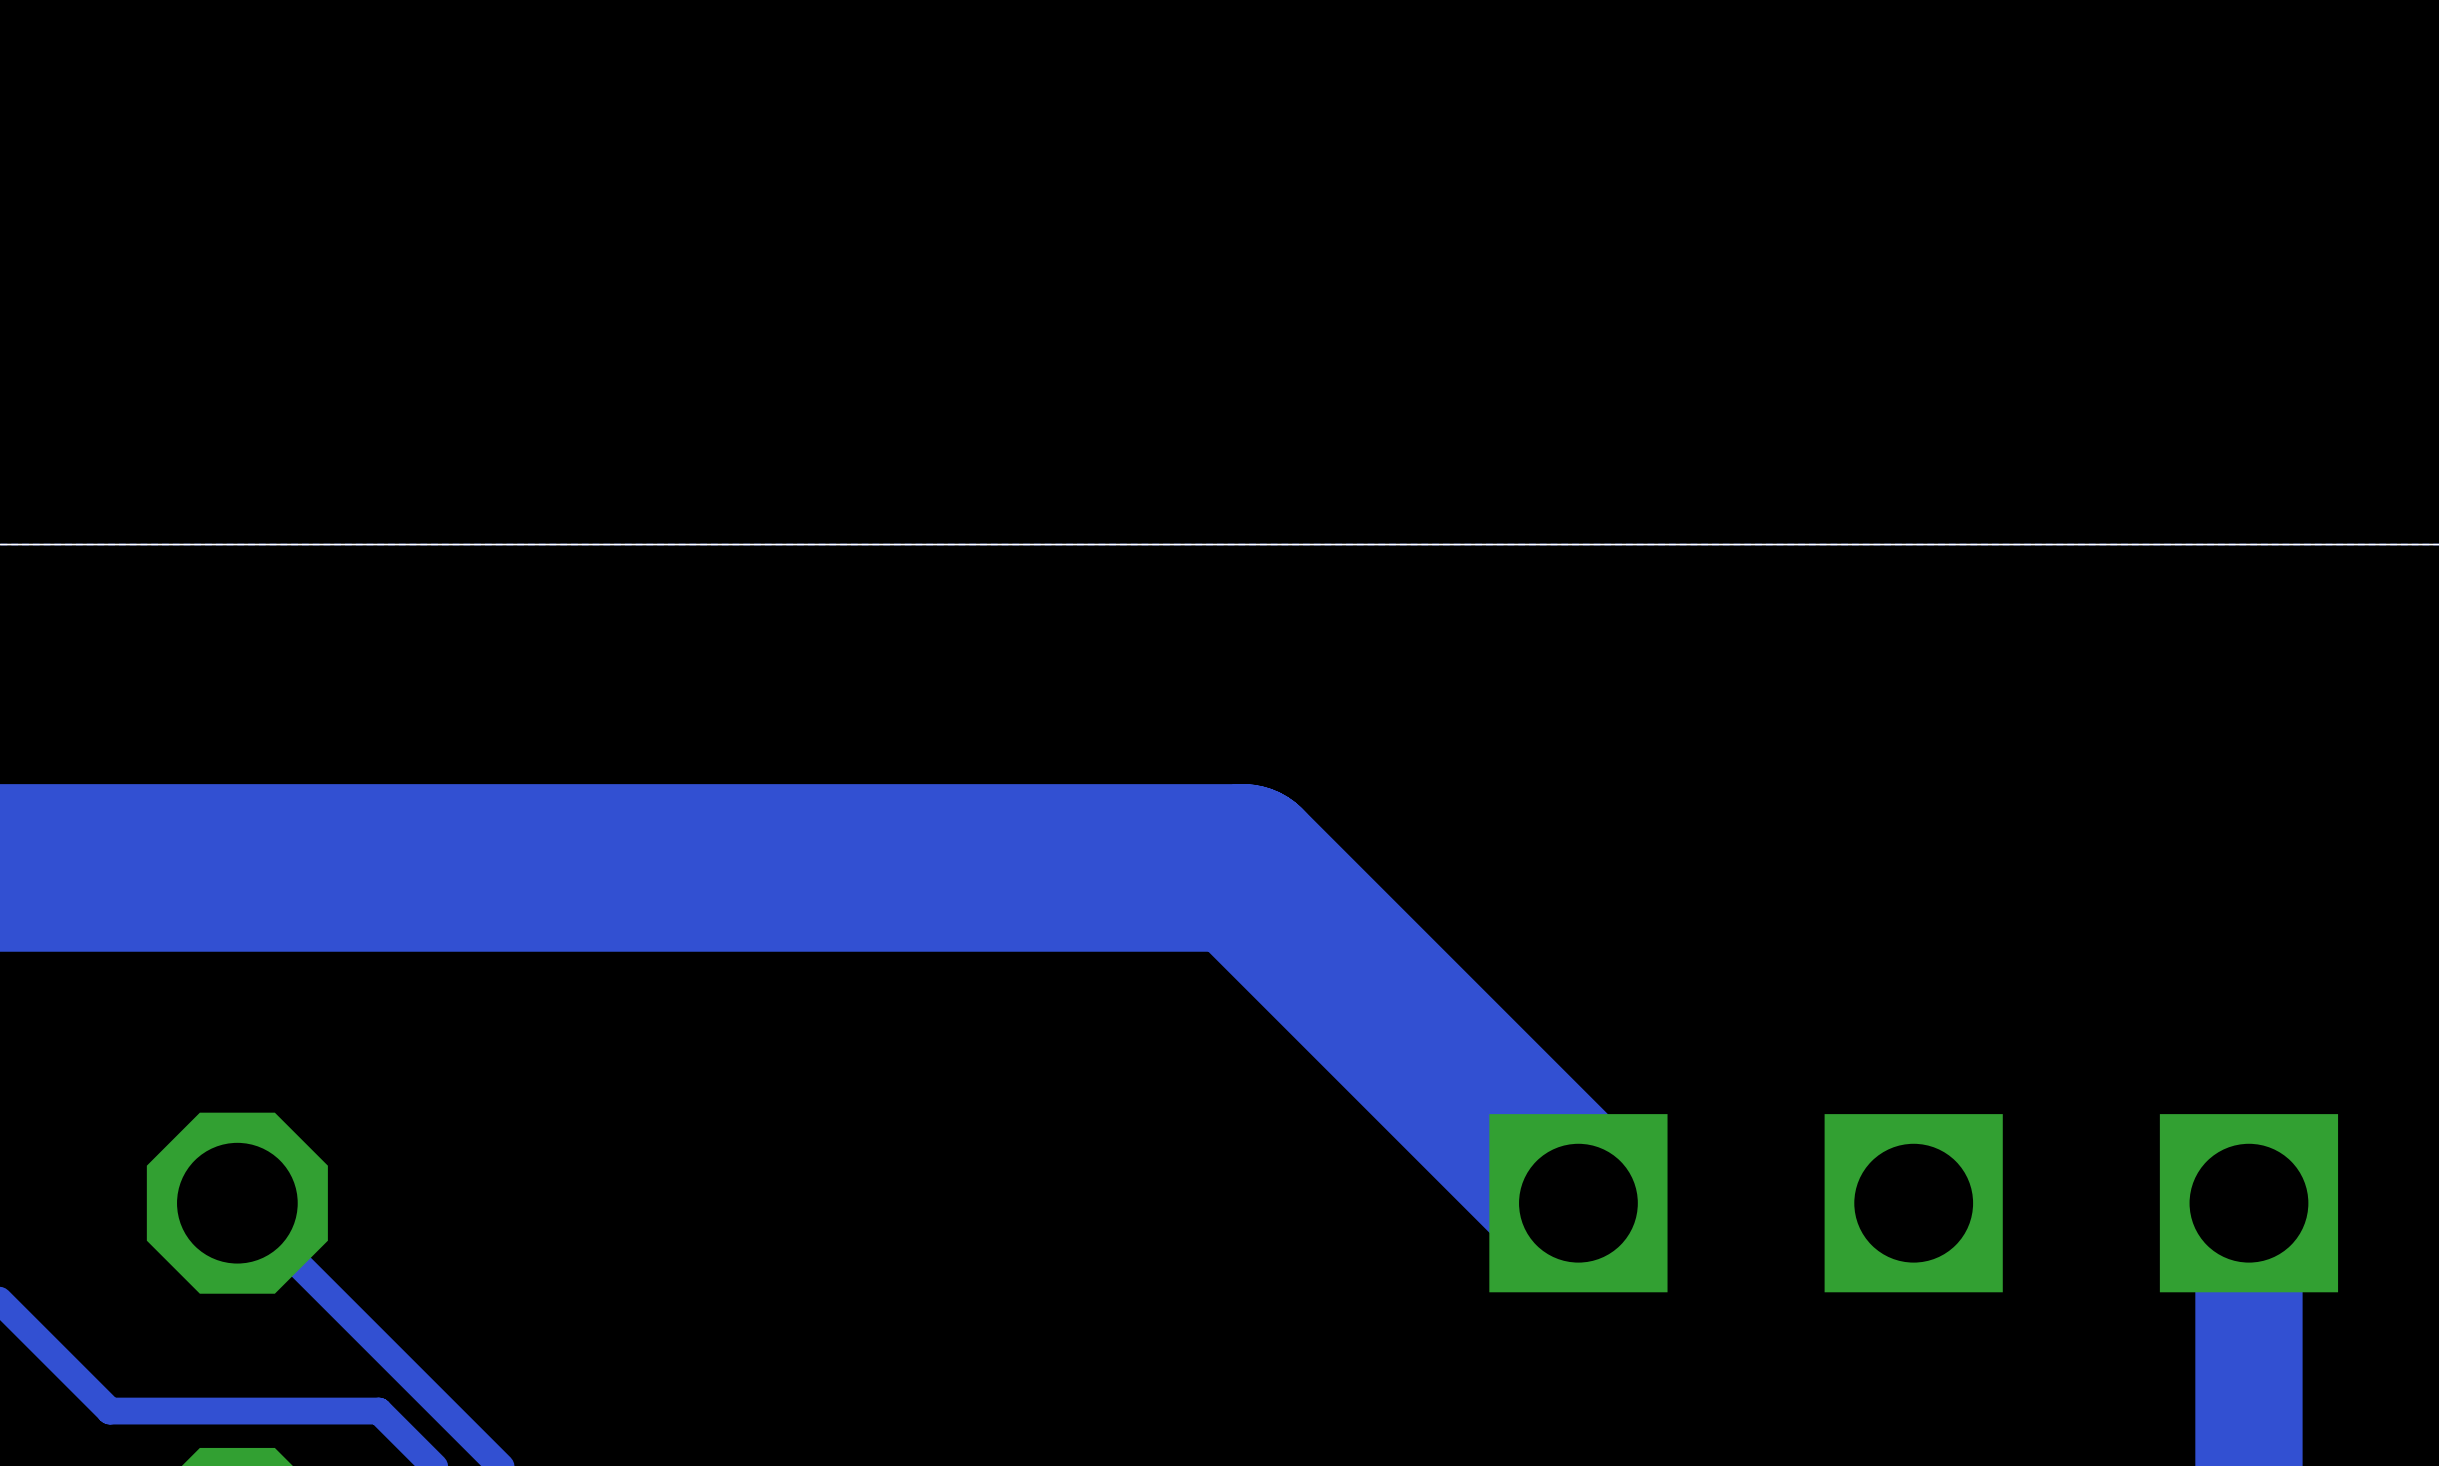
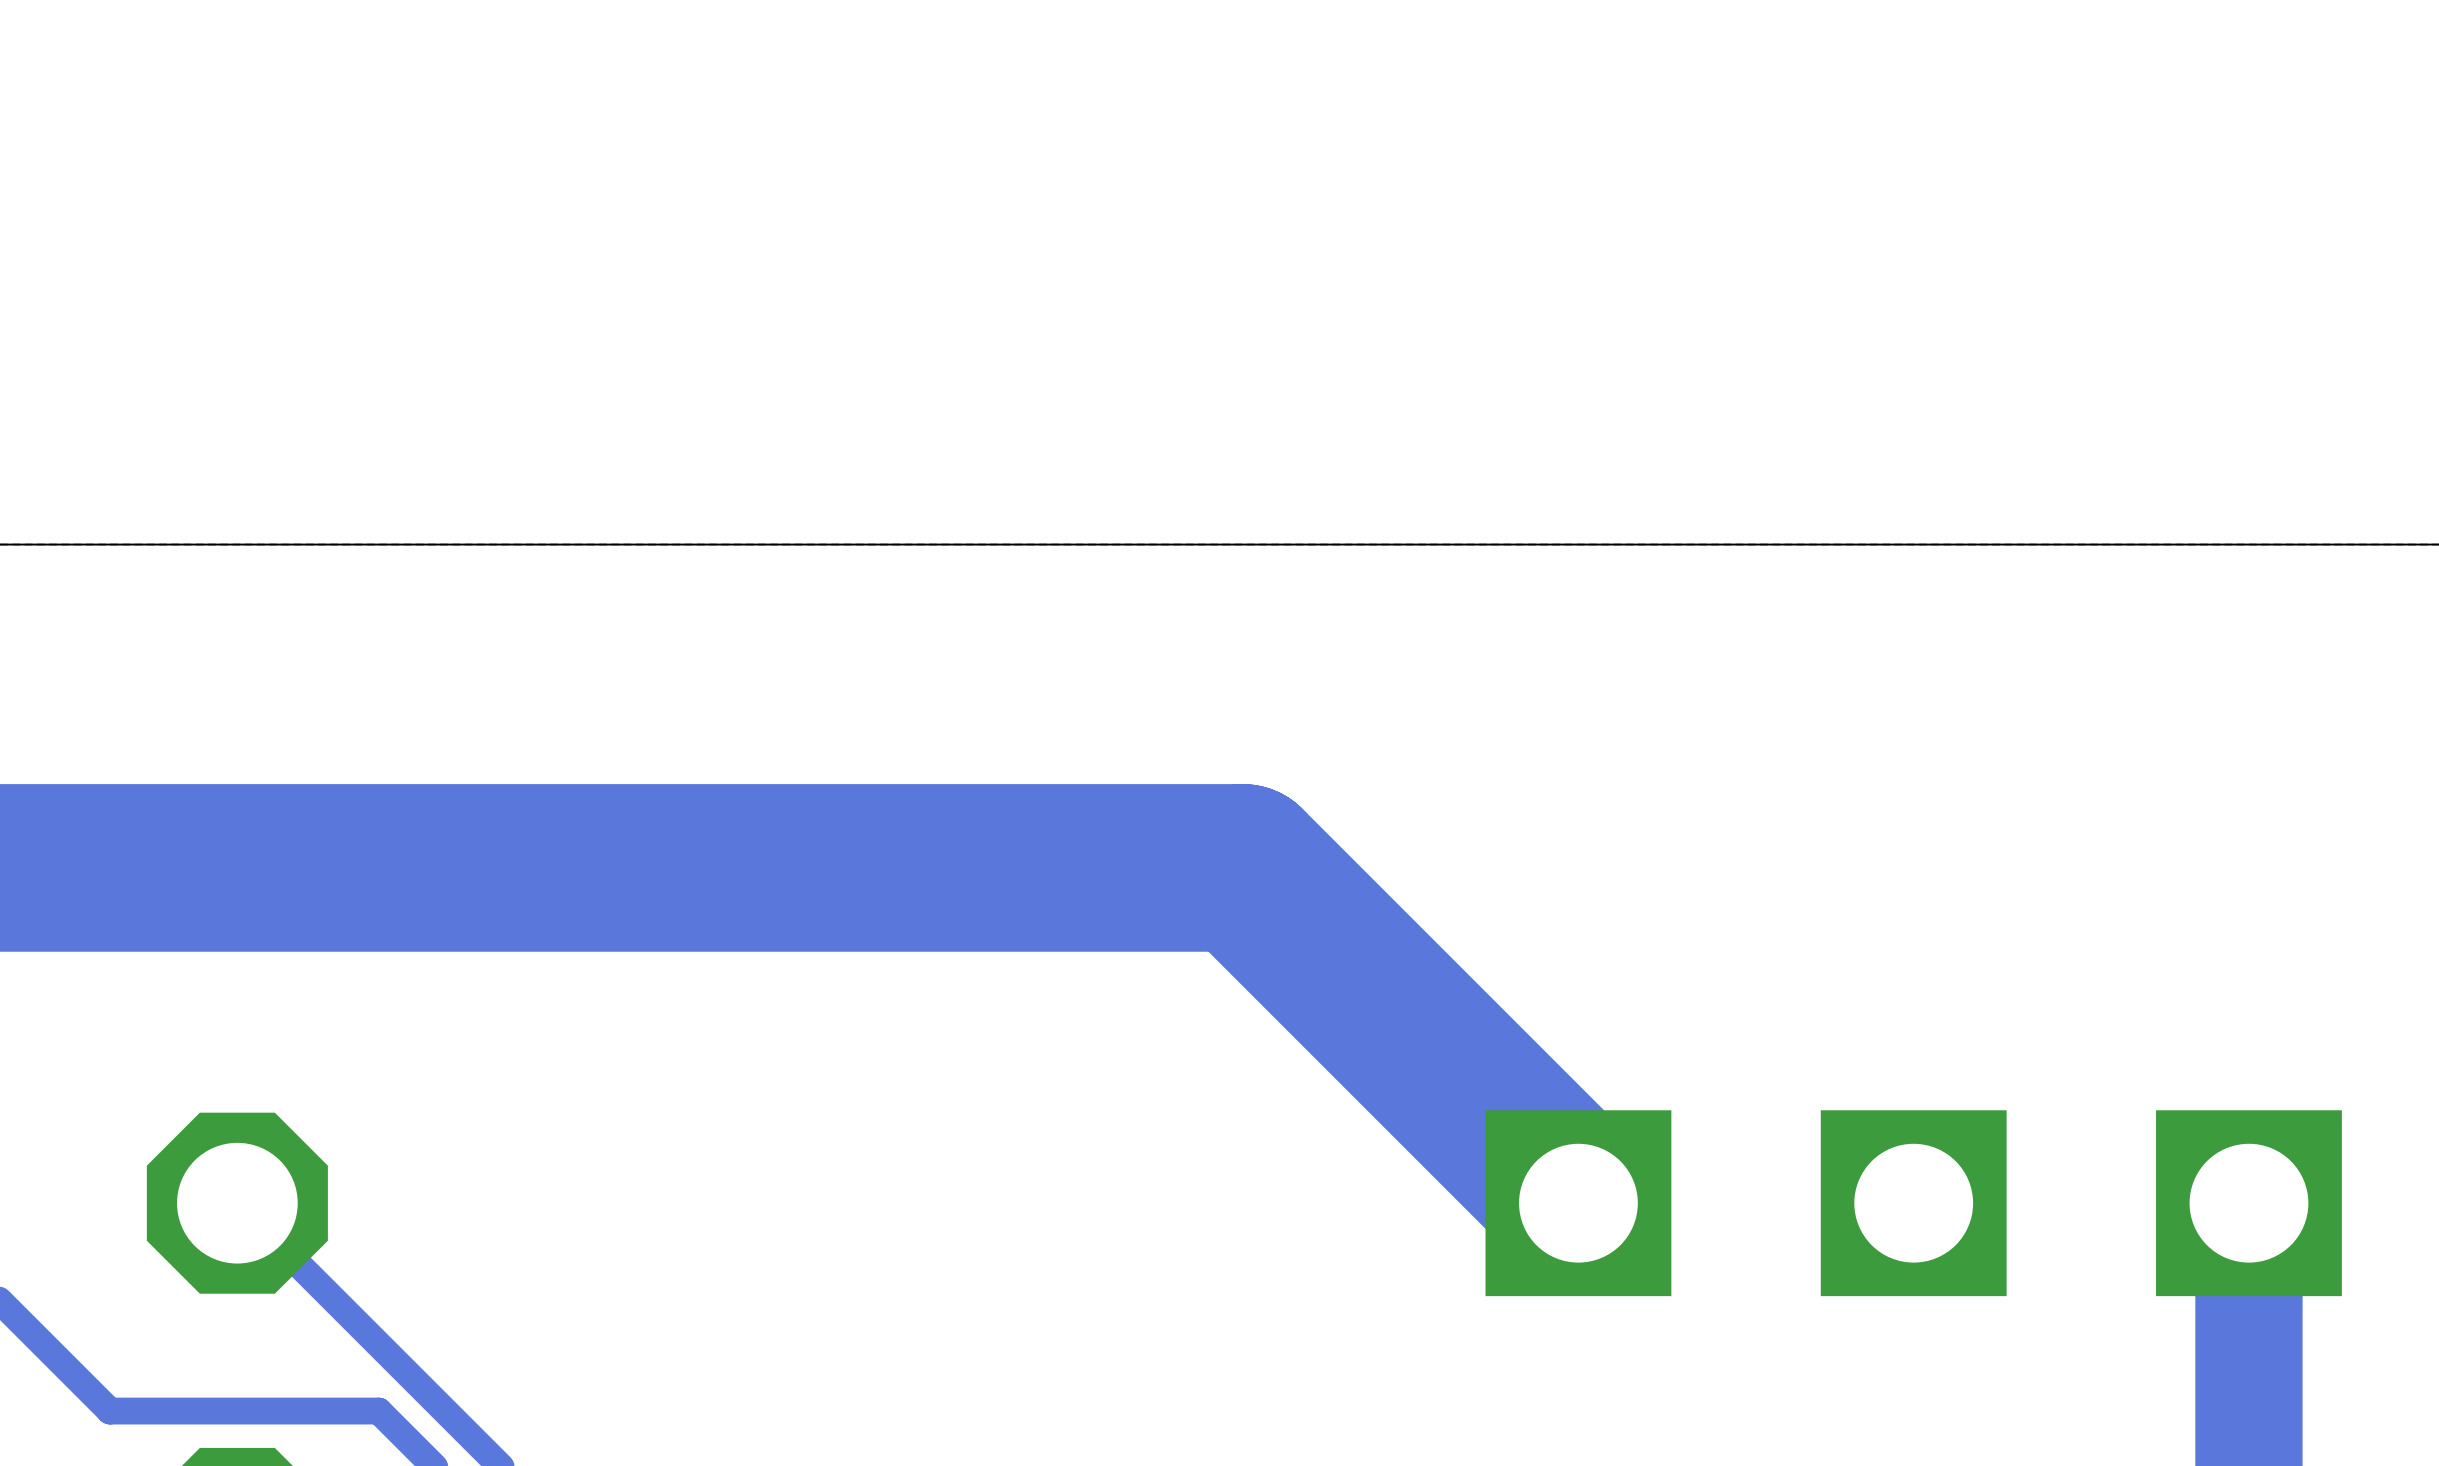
part footprint: [1489, 1114, 2339, 1293] -> [1485, 1110, 2342, 1297]

